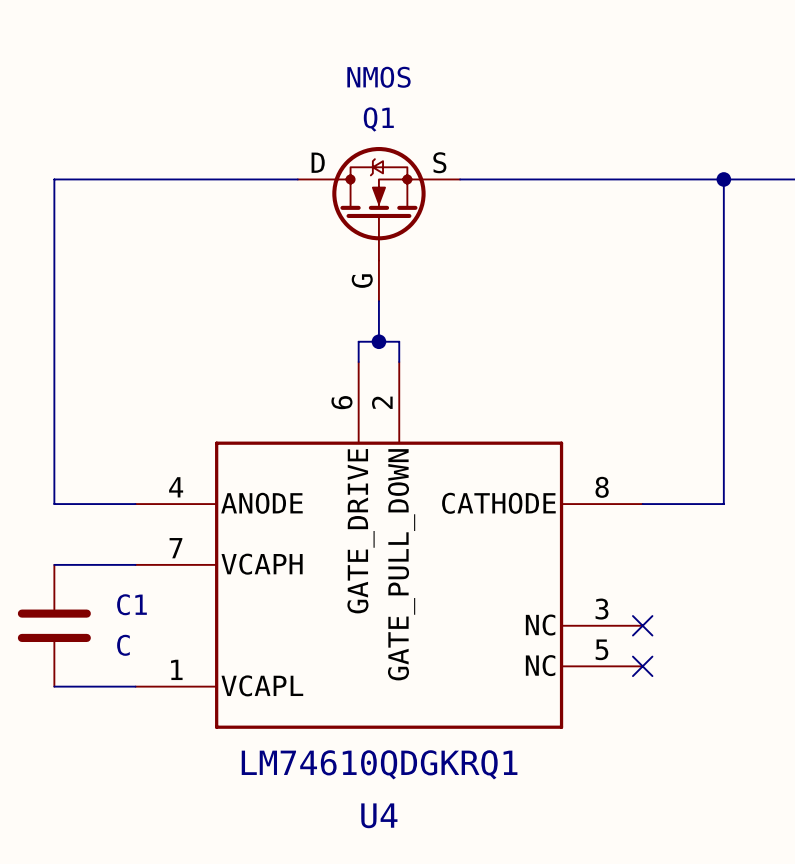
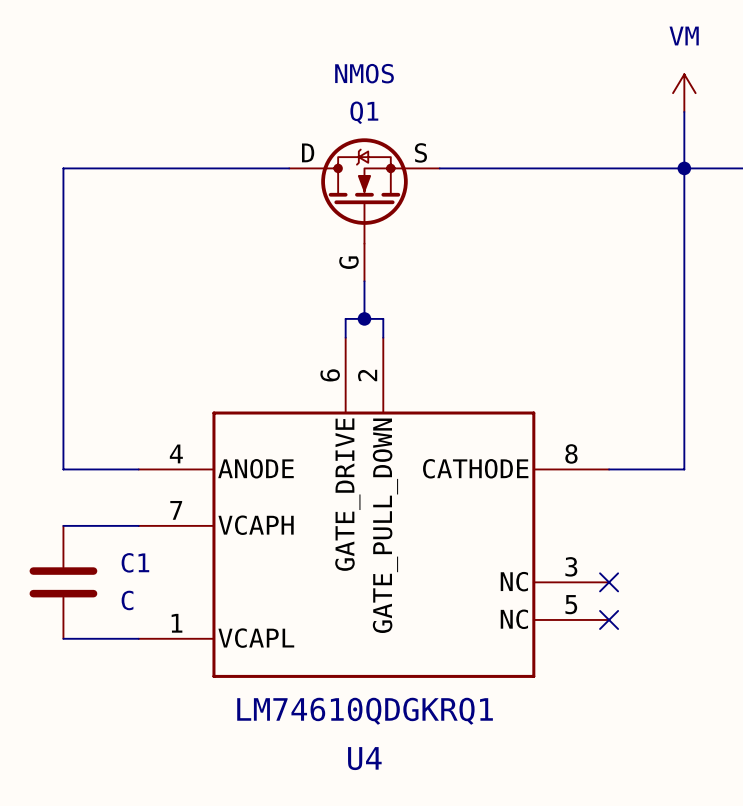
power symbol: none -> VM (684, 93)
wire: none -> (684, 111) (684, 168)

